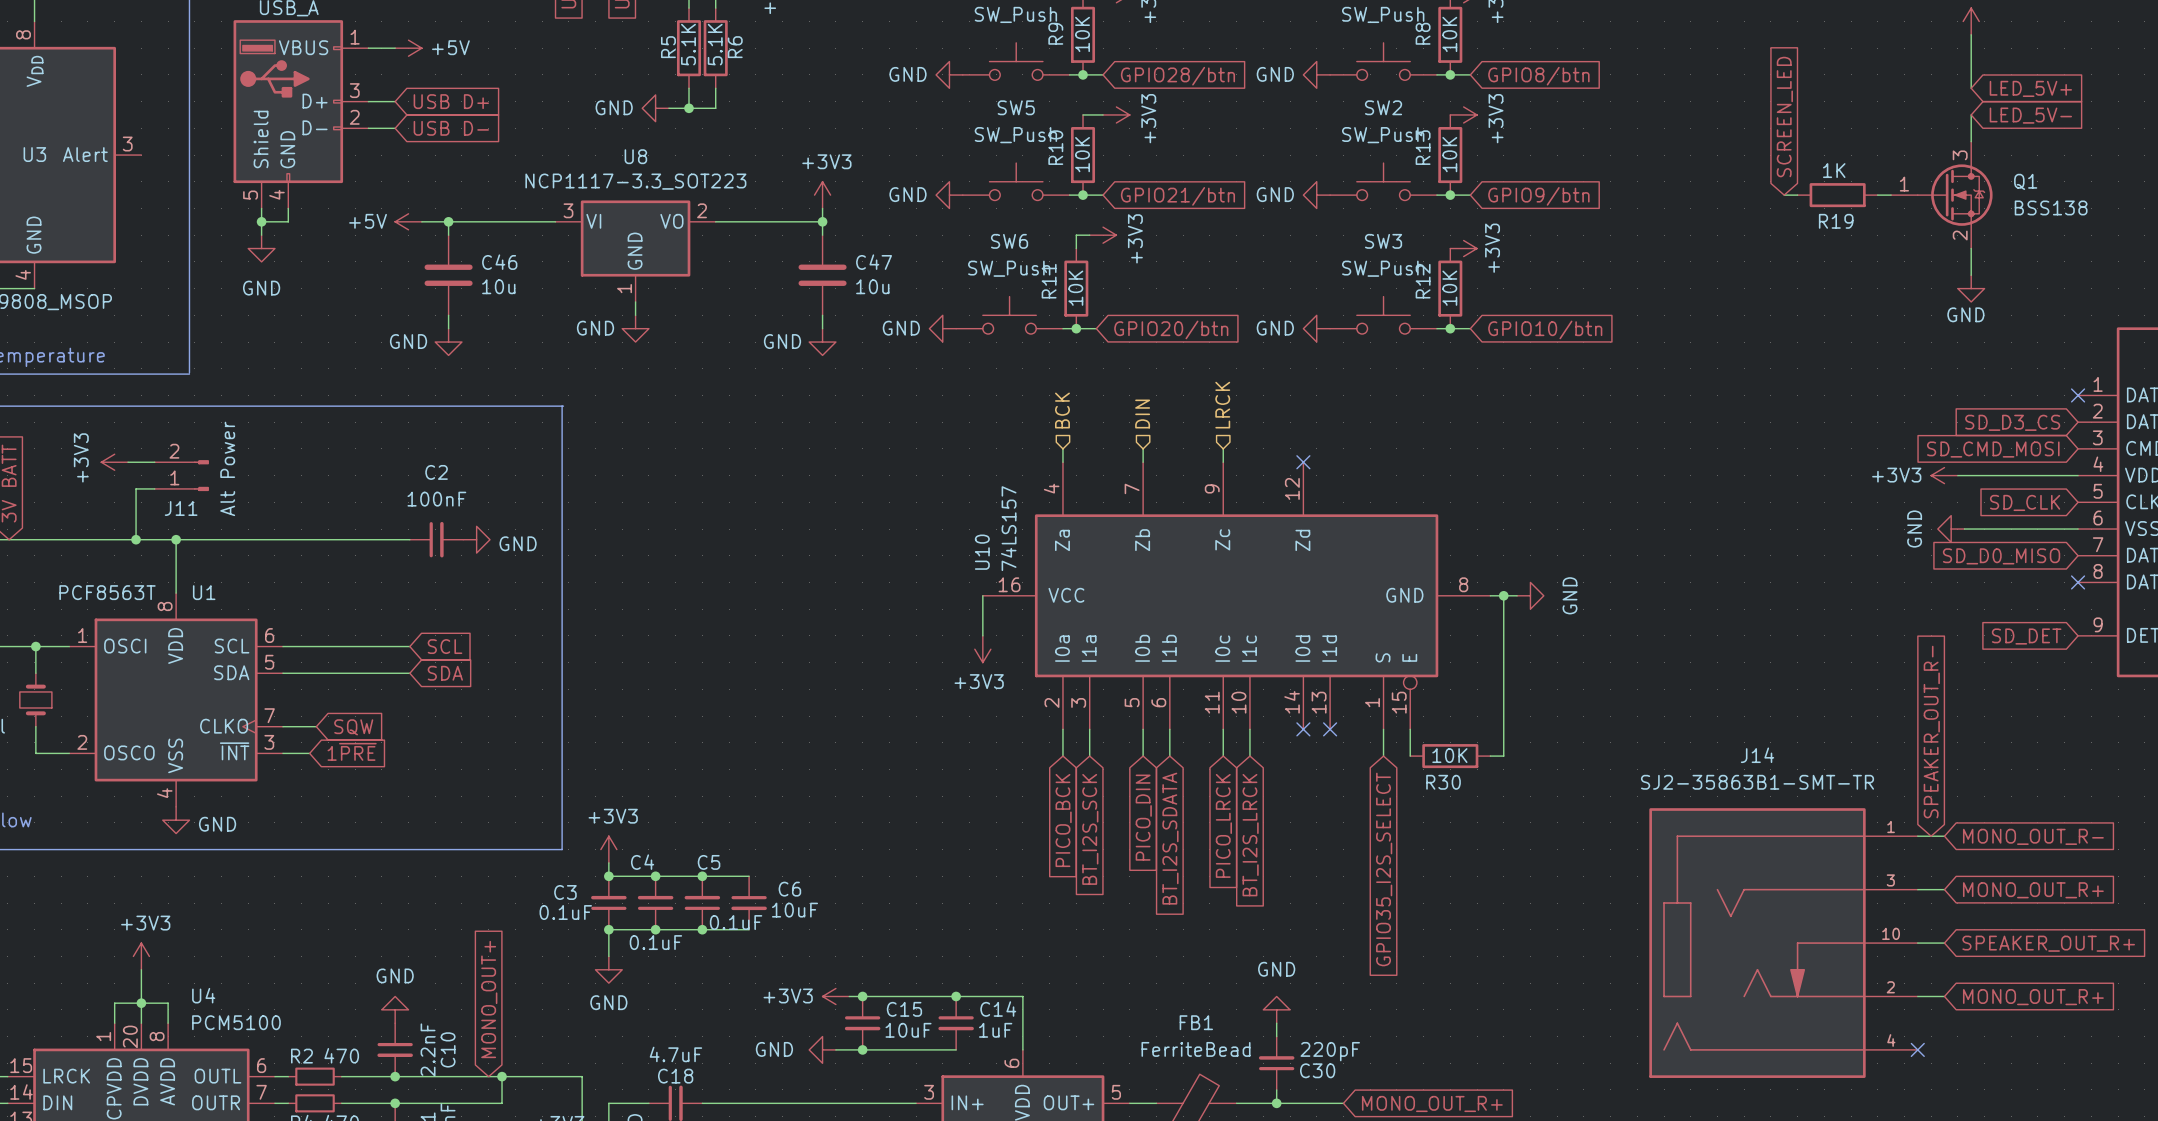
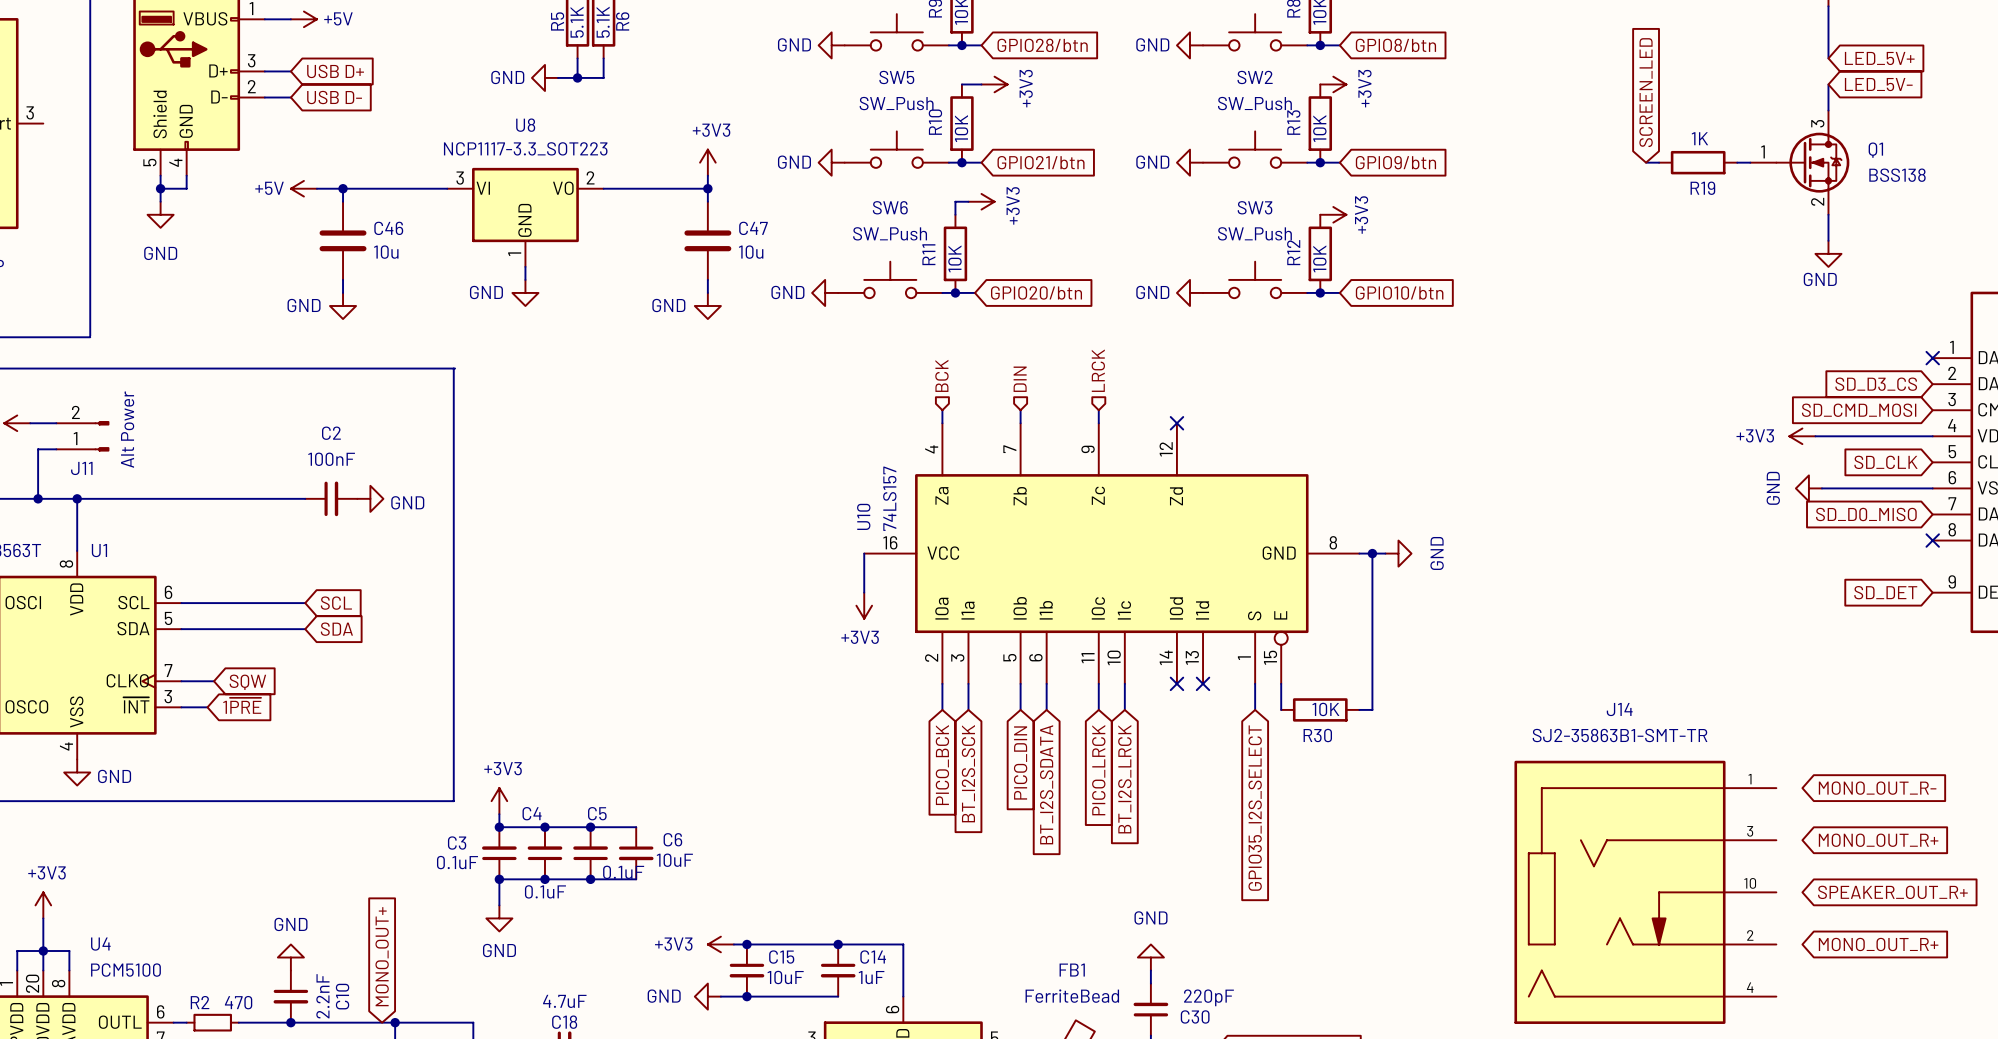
global label: SPEAKER_OUT_R- (1931, 732) -> none
wire: (1917, 836) (1944, 836) -> none
wire: (1917, 889) (1944, 889) -> none
wire: (1917, 943) (1944, 943) -> none
wire: (1917, 996) (1944, 996) -> none
no-connect mark: (1917, 1049) -> none

